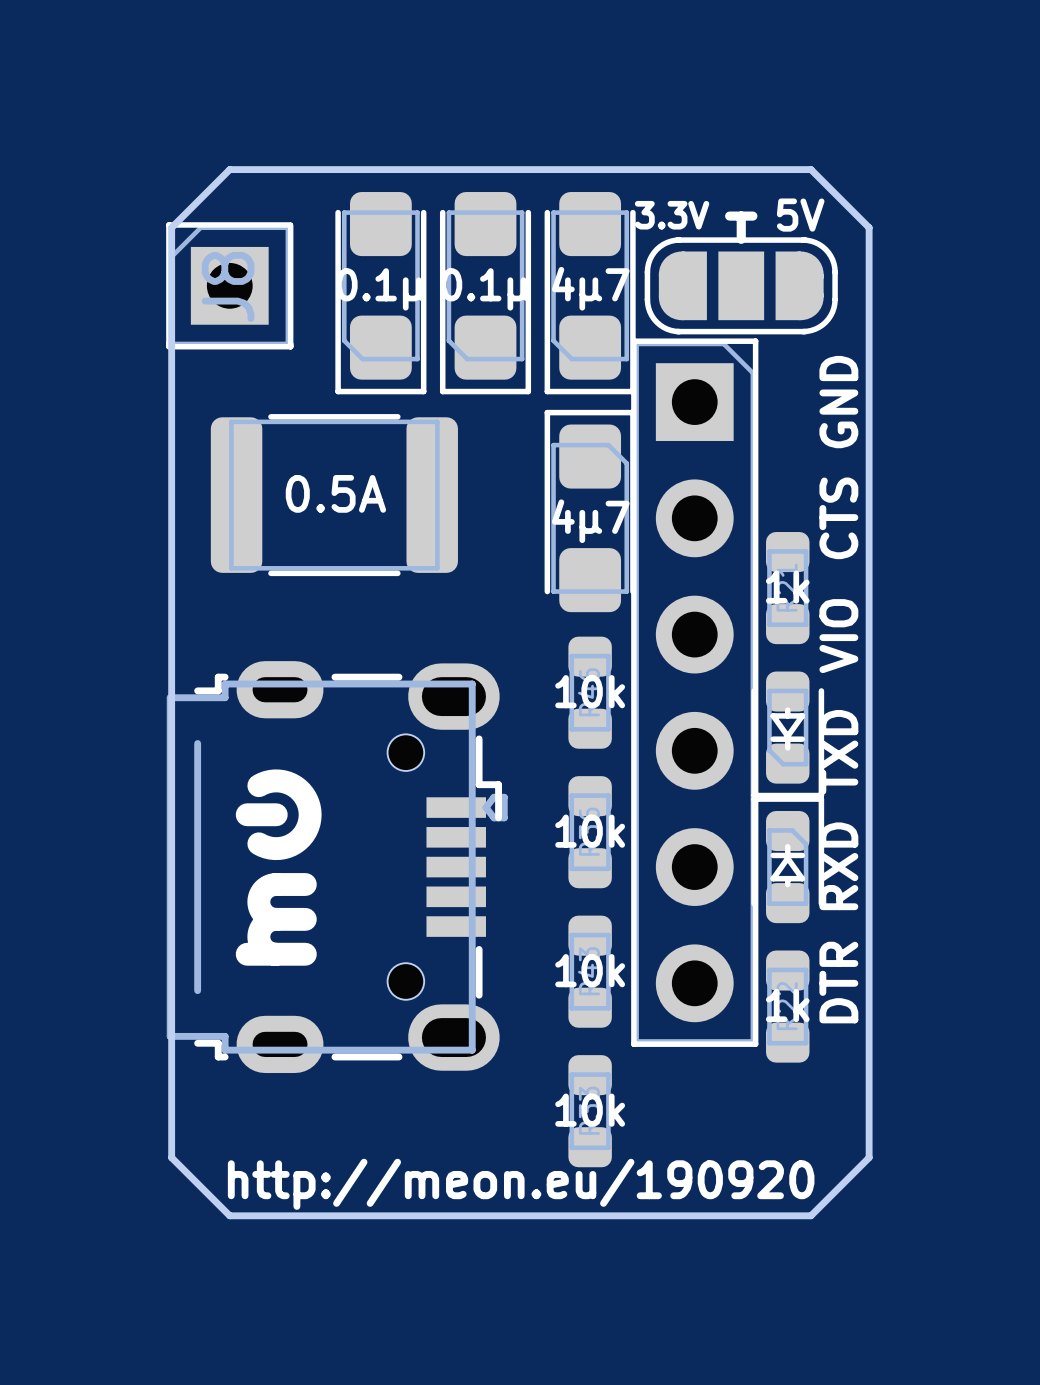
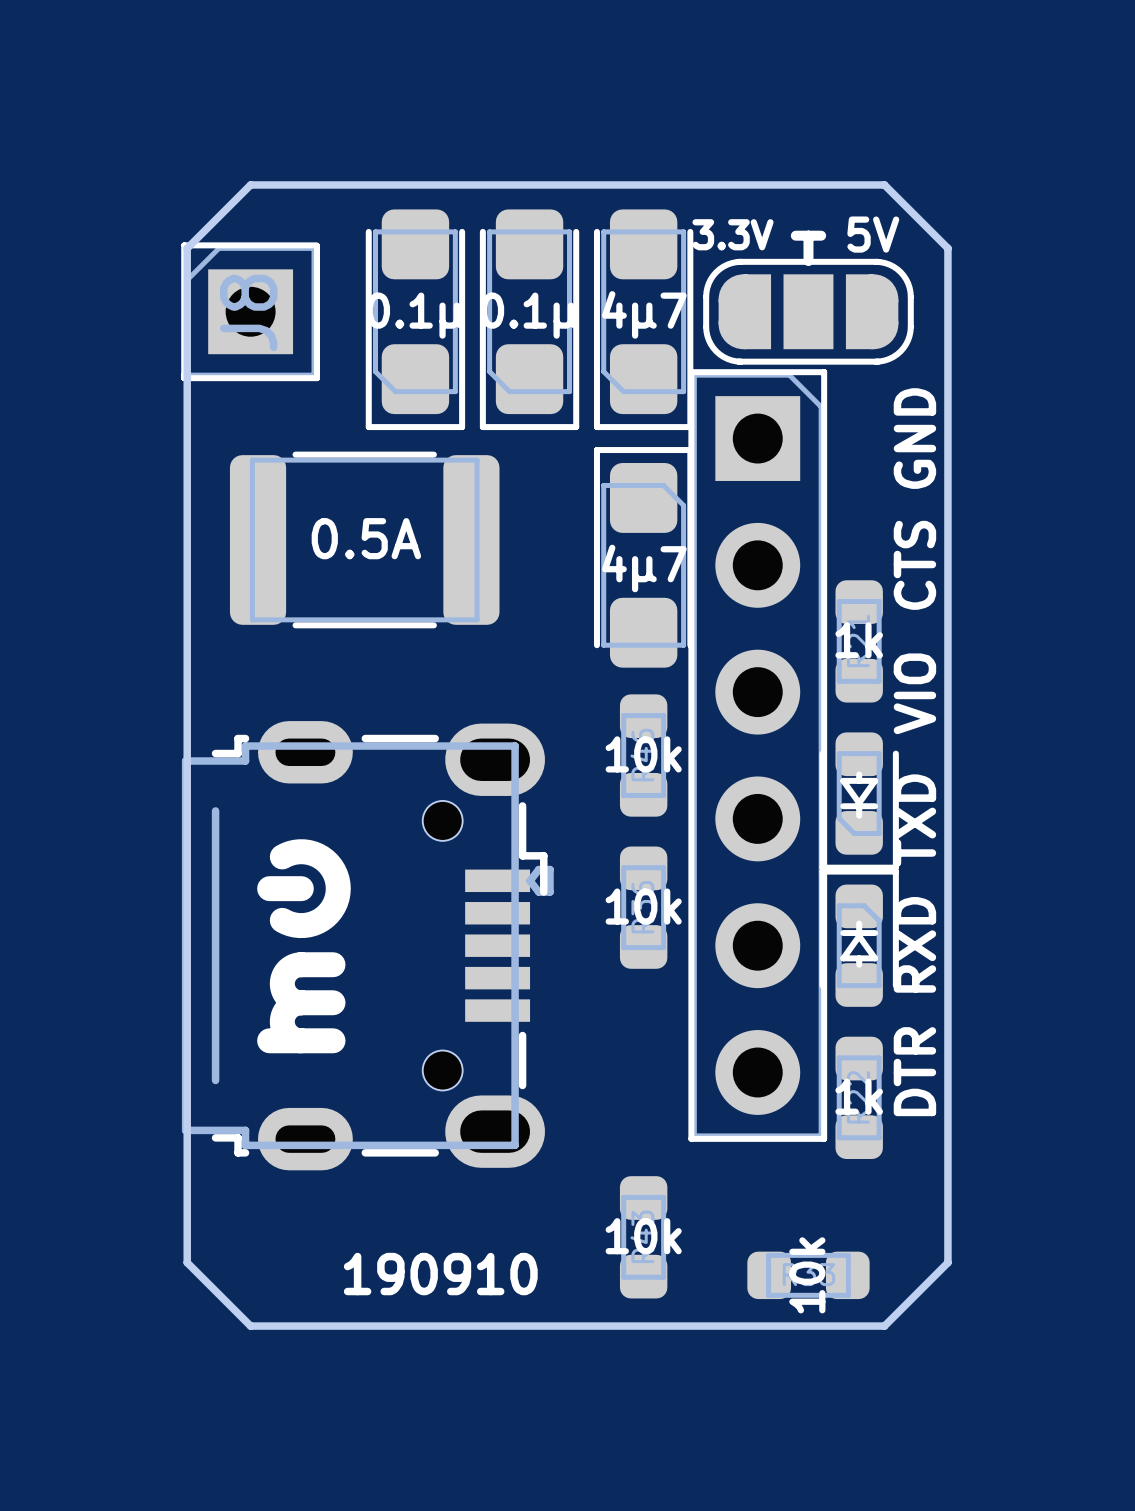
part position: (590, 971) -> (643, 1237)
part rotation: 0° (590, 1111) -> 90° clockwise (808, 1275)
part position: (590, 1111) -> (808, 1275)
text: none -> 190910 (440, 1274)
text: http://meon.eu/190920 (521, 1184) -> none

